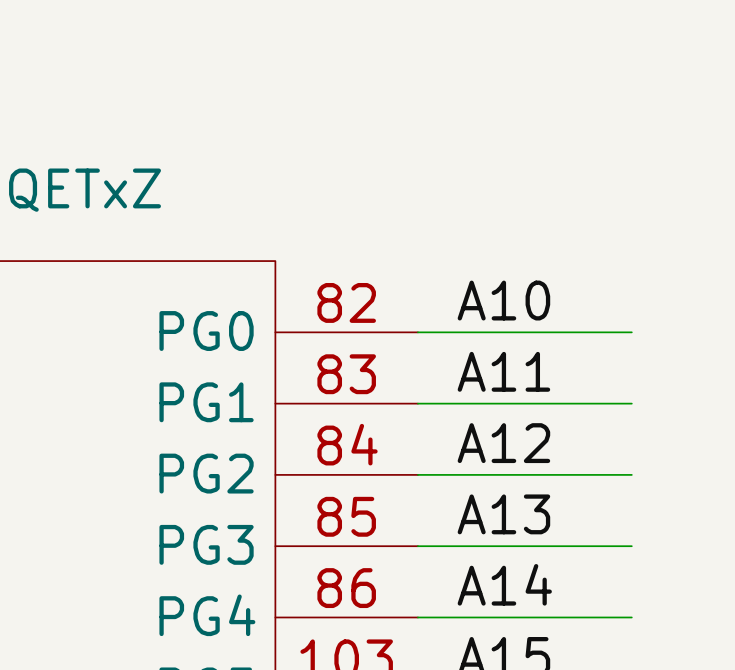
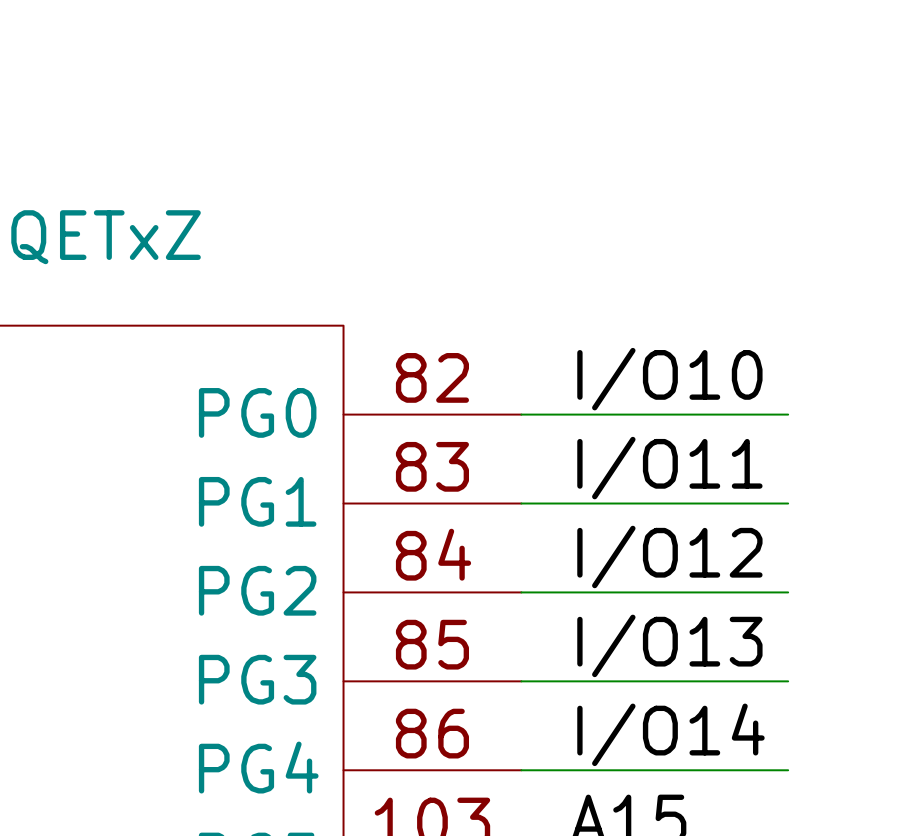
label: A10 (503, 300) -> I/O10 (669, 379)
label: A11 (503, 371) -> I/O11 (669, 468)
label: A12 (503, 443) -> I/O12 (669, 556)
label: A13 (503, 514) -> I/O13 (669, 645)
label: A14 (504, 584) -> I/O14 (670, 734)

